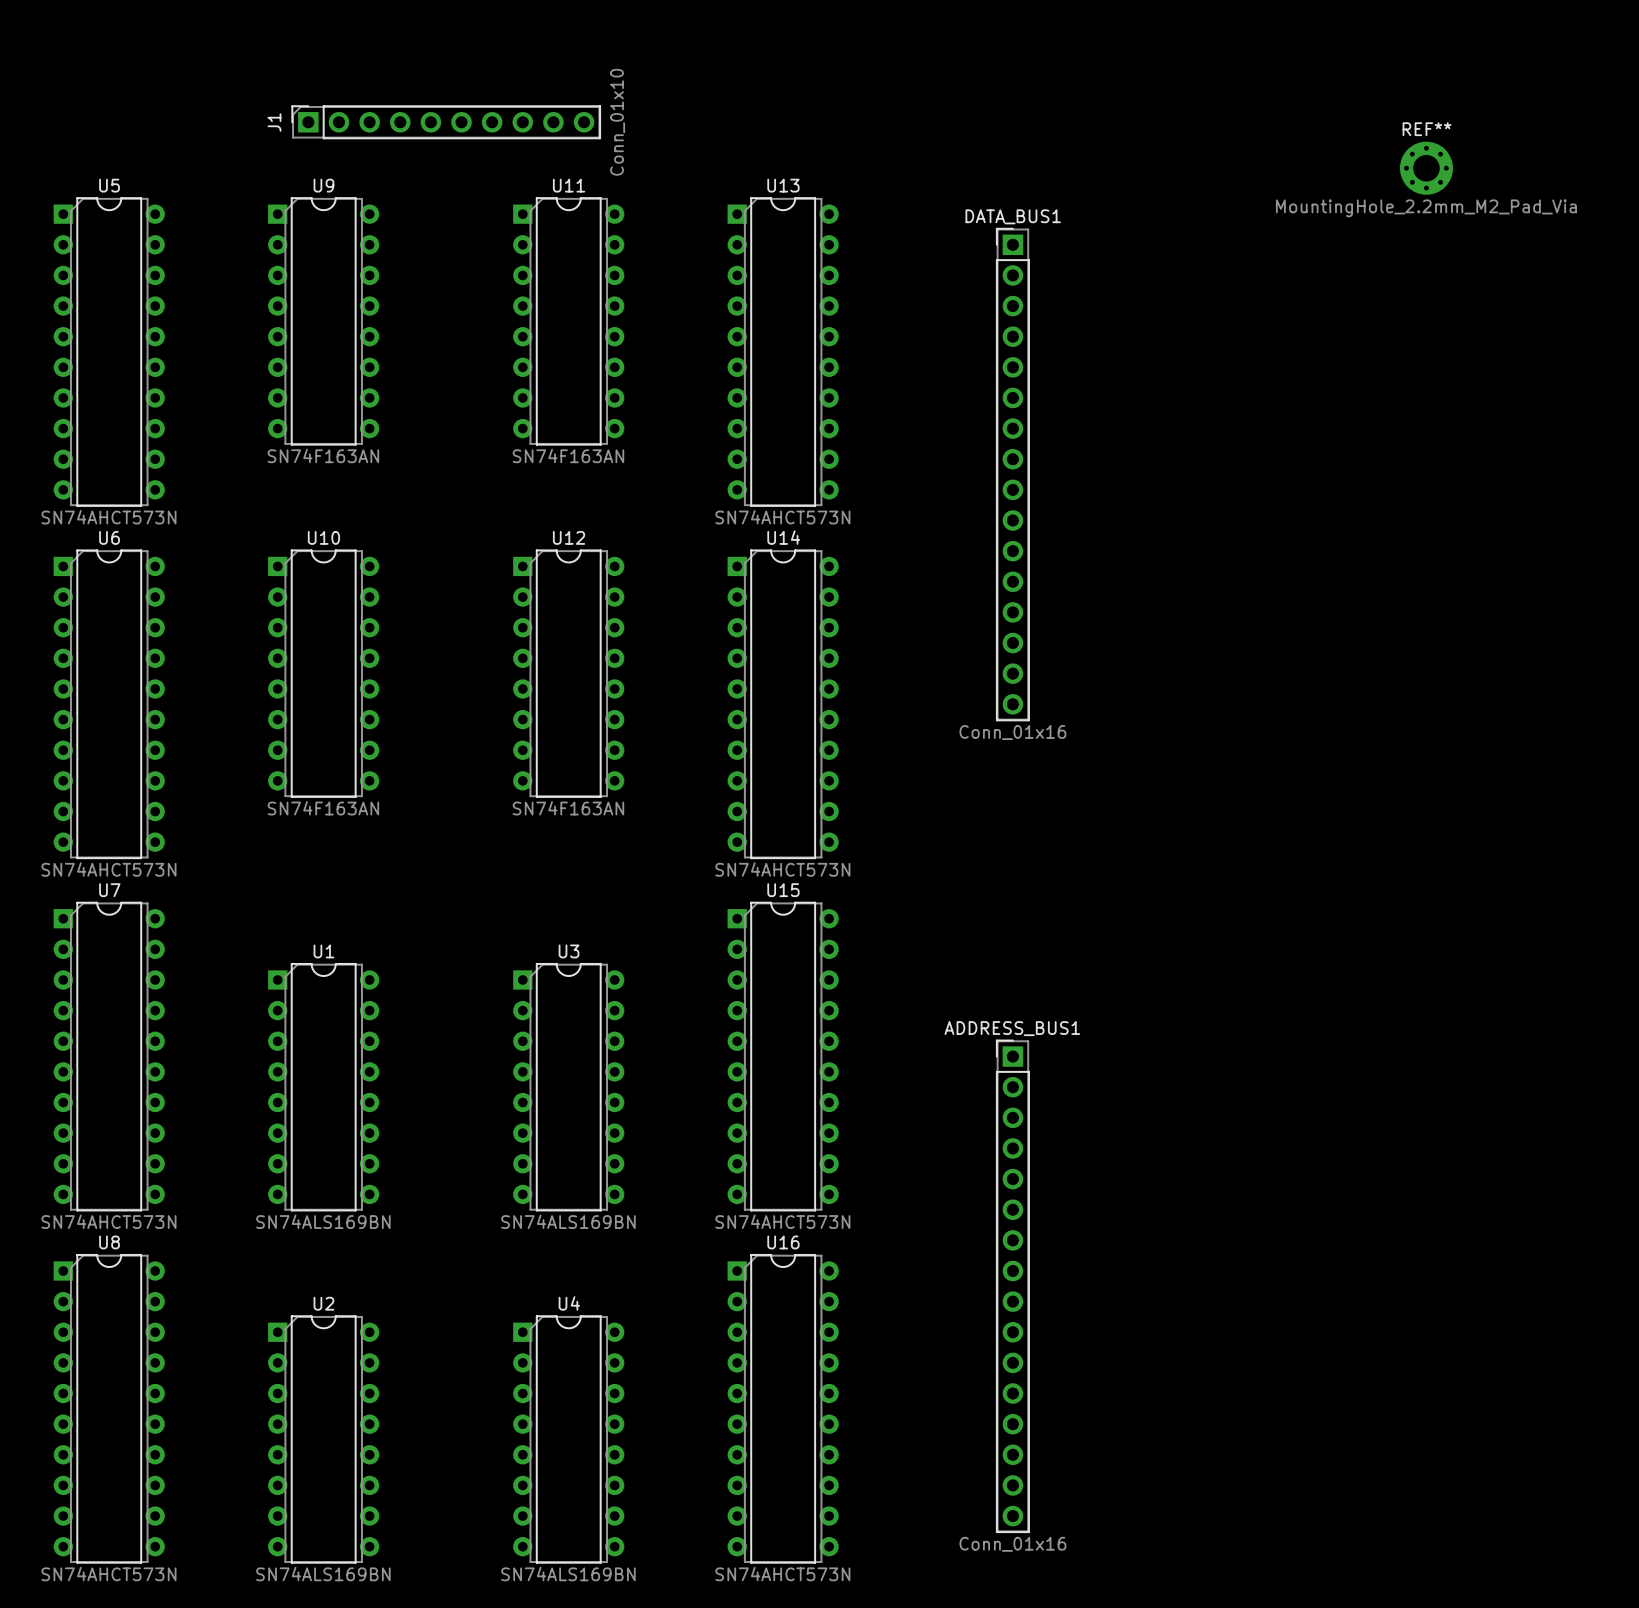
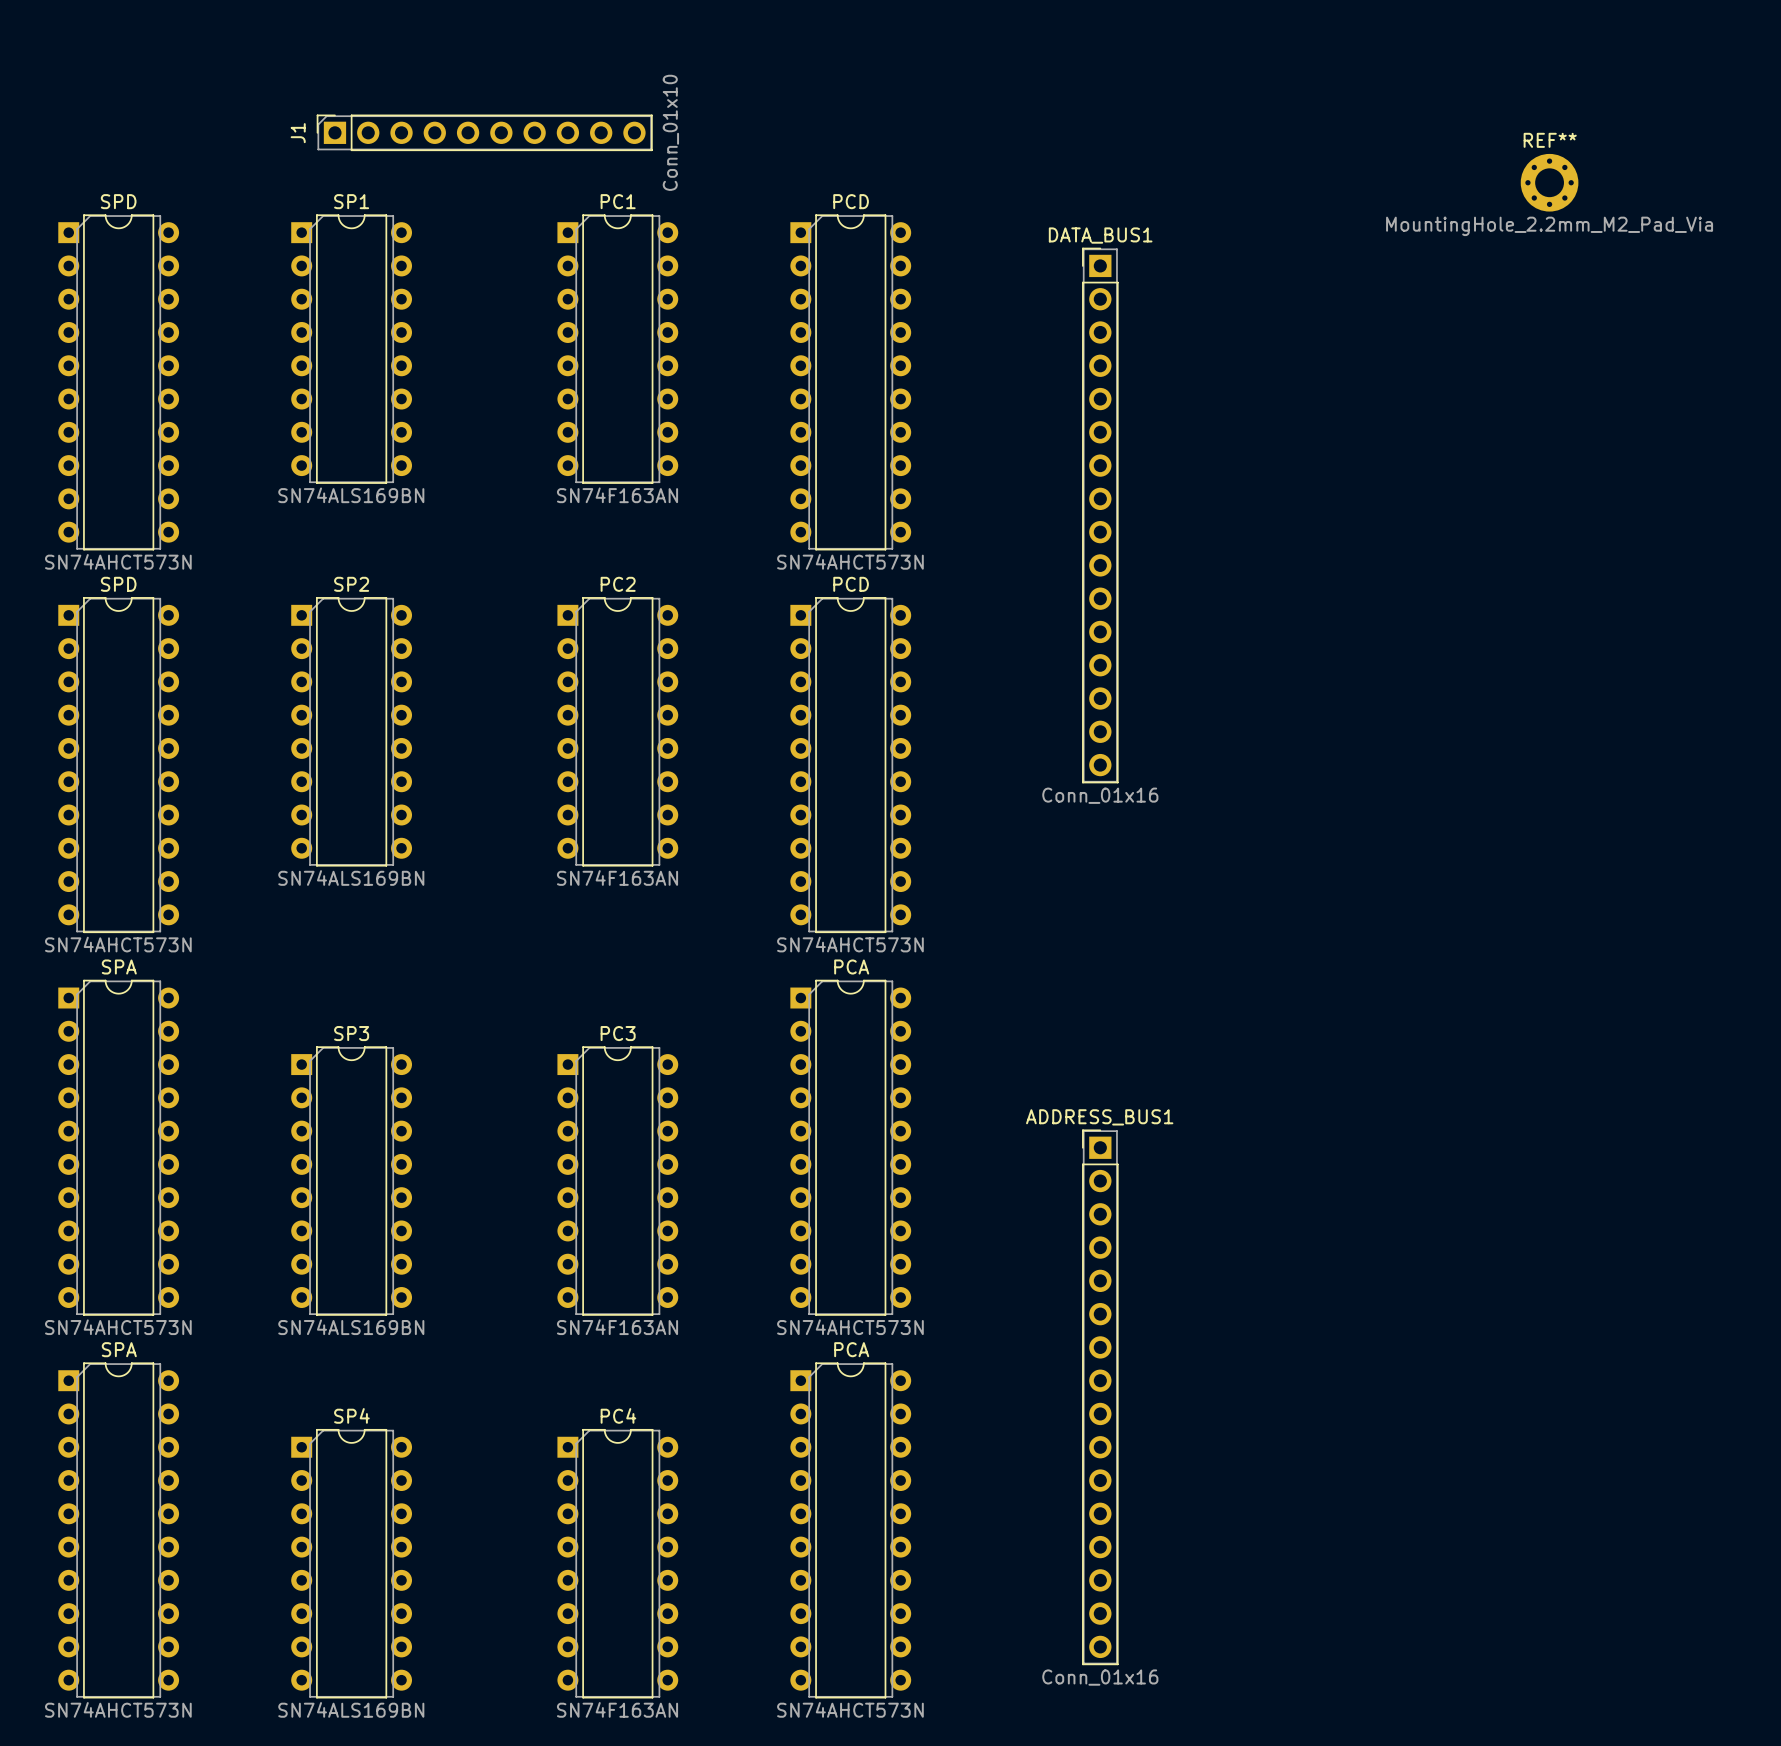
U5 name: U5 (109, 185) -> SPD (118, 201)
U9 name: U9 (323, 185) -> SP1 (351, 201)
U11 name: U11 (569, 185) -> PC1 (618, 201)
U13 name: U13 (783, 185) -> PCD (851, 201)
U9 value: SN74F163AN (323, 455) -> SN74ALS169BN (351, 495)
U6 name: U6 (109, 537) -> SPD (118, 584)
U10 name: U10 (323, 537) -> SP2 (351, 584)
U12 name: U12 (569, 537) -> PC2 (618, 584)
U14 name: U14 (783, 537) -> PCD (851, 584)
U10 value: SN74F163AN (323, 808) -> SN74ALS169BN (351, 877)
U7 name: U7 (109, 890) -> SPA (119, 967)
U15 name: U15 (783, 890) -> PCA (851, 967)
U1 name: U1 (323, 951) -> SP3 (351, 1033)
U3 name: U3 (569, 951) -> PC3 (618, 1033)
U3 value: SN74ALS169BN (568, 1221) -> SN74F163AN (617, 1327)
U8 name: U8 (109, 1242) -> SPA (119, 1349)
U16 name: U16 (783, 1242) -> PCA (851, 1349)
U2 name: U2 (323, 1303) -> SP4 (351, 1415)
U4 name: U4 (569, 1303) -> PC4 (618, 1415)
U4 value: SN74ALS169BN (568, 1574) -> SN74F163AN (617, 1709)

